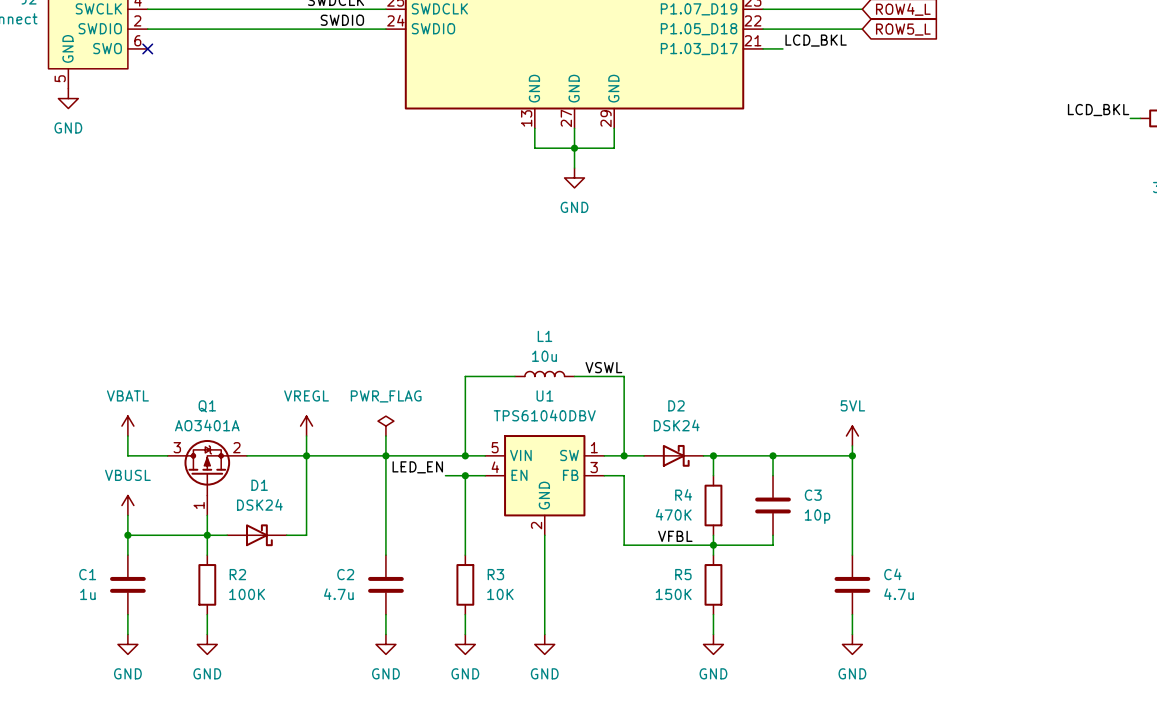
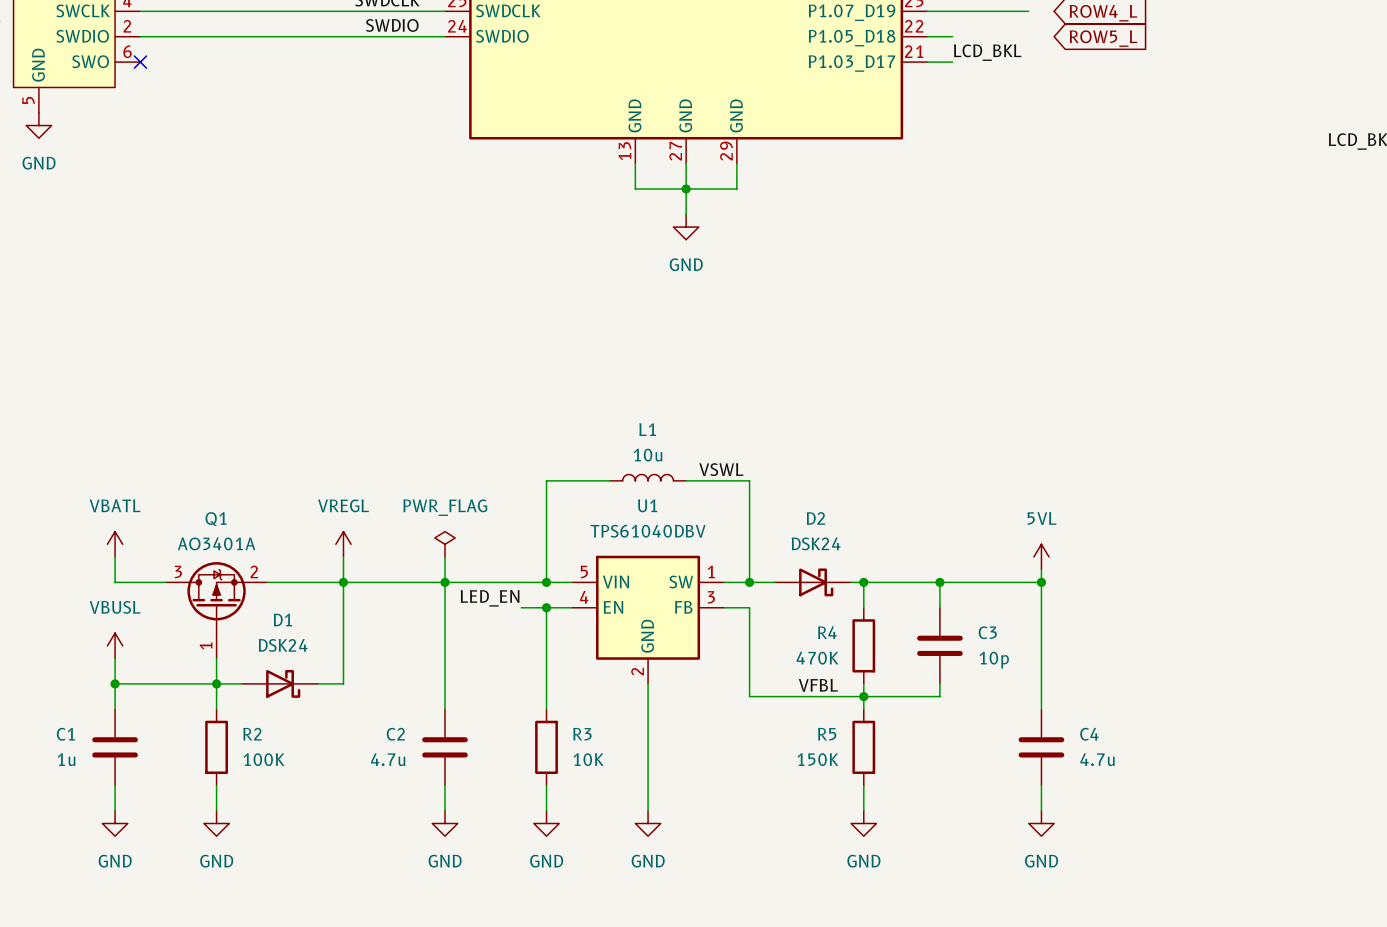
wire: (842, 9) (862, 9) -> none
wire: (782, 29) (862, 29) -> none

